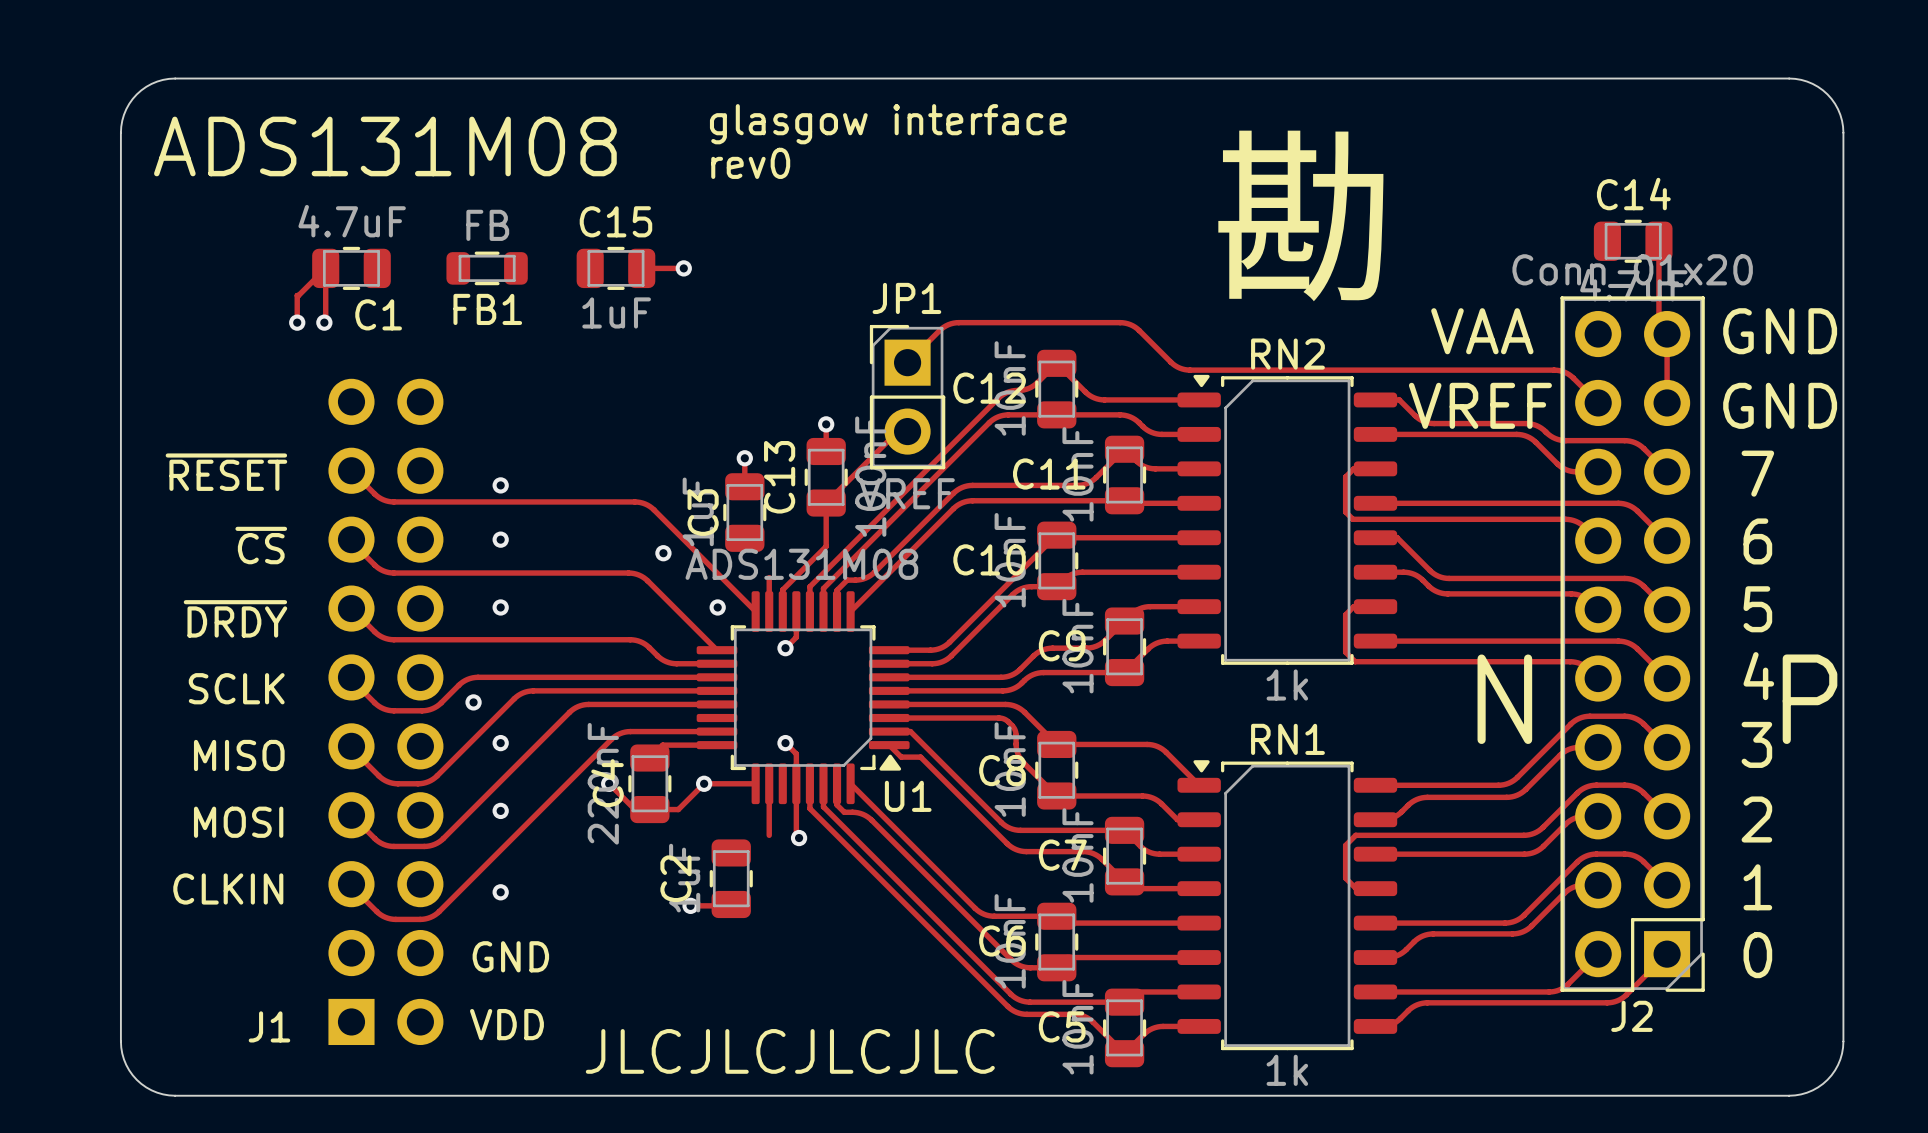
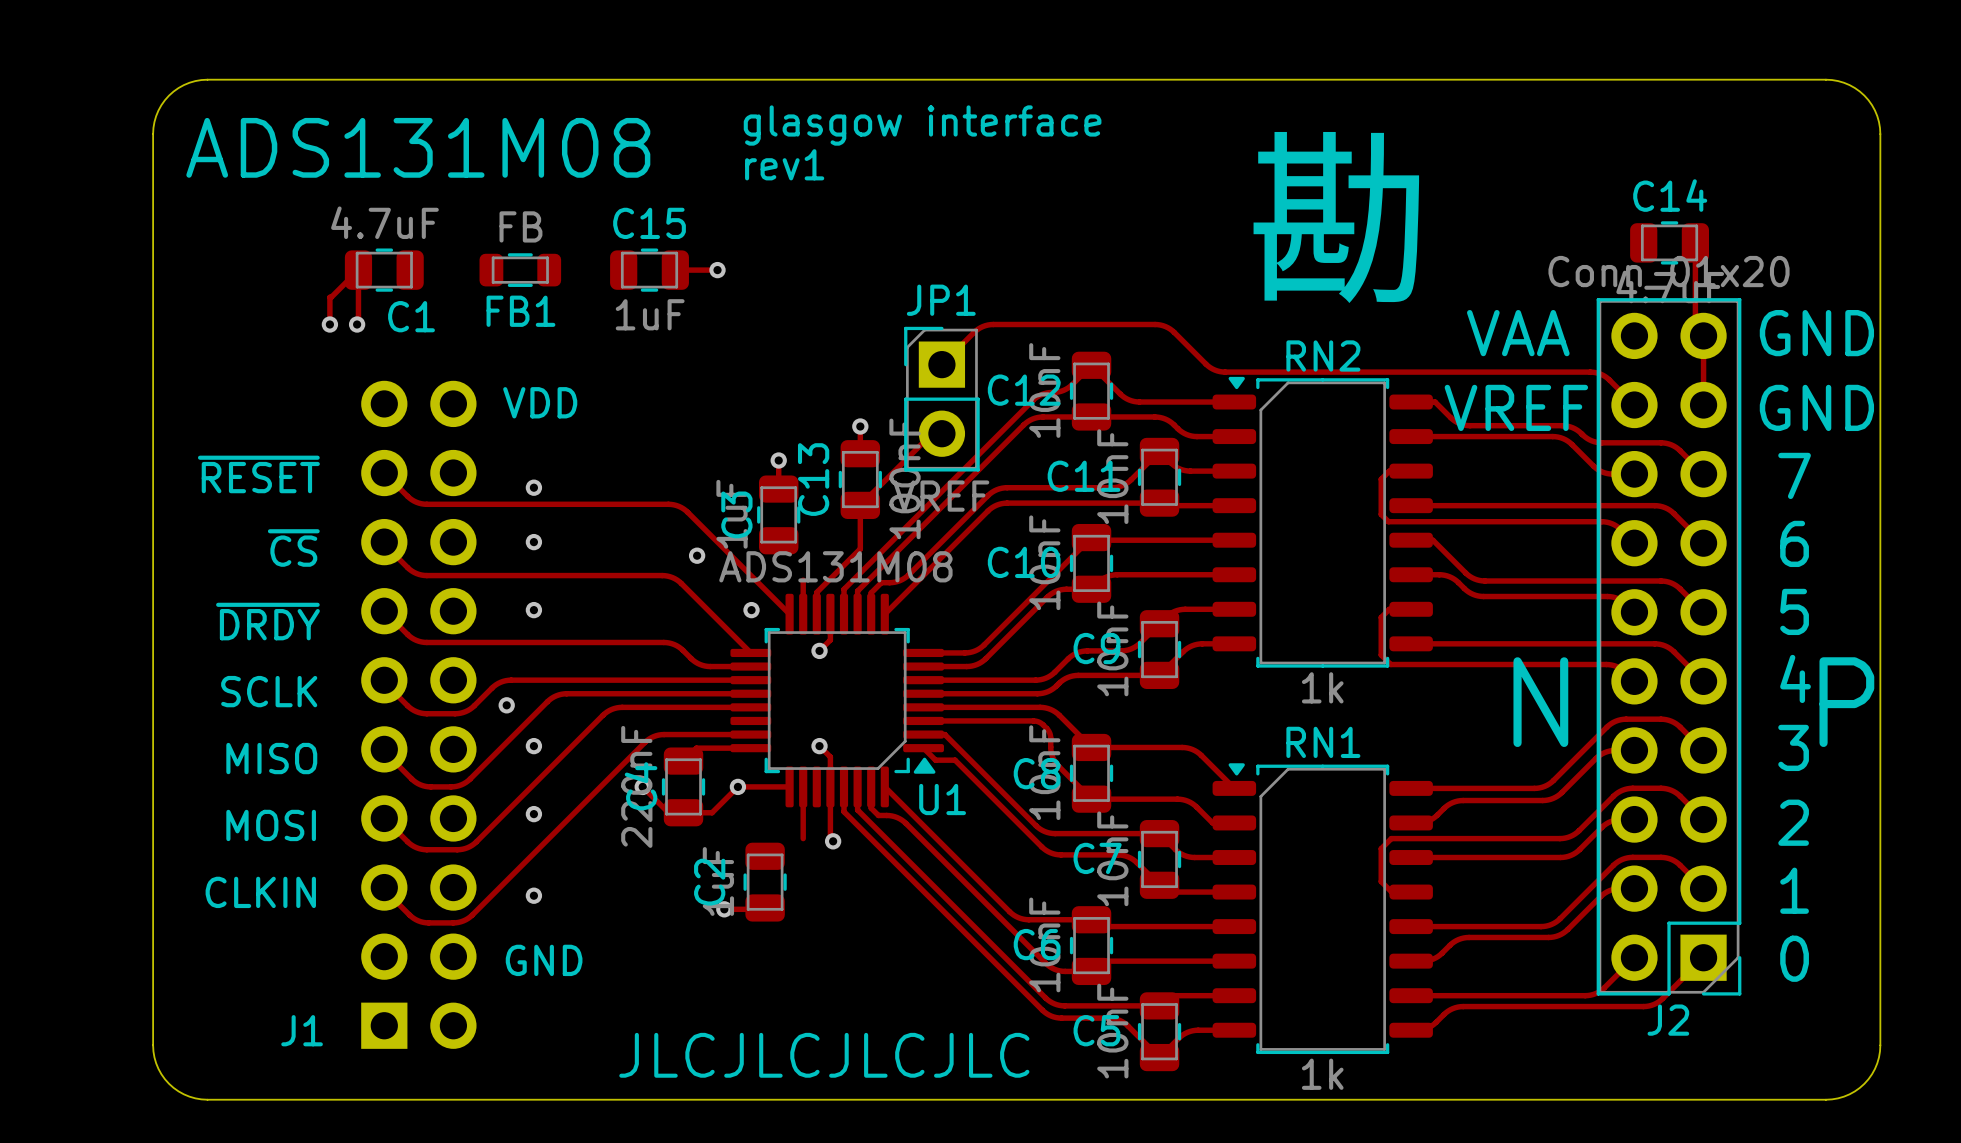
text: rev0 (750, 163) -> rev1 (784, 164)
text position: VDD (506, 1024) -> VDD (540, 402)

